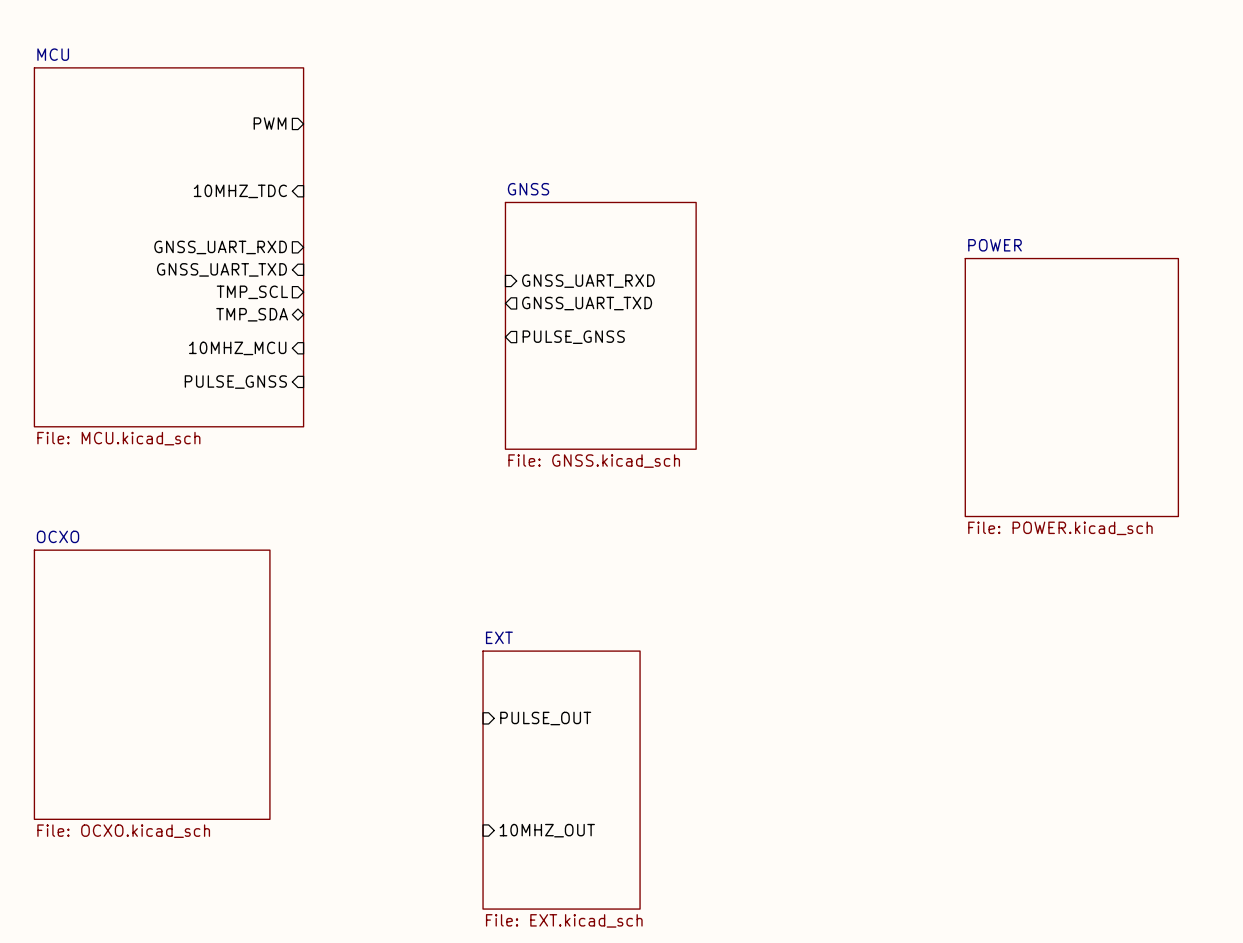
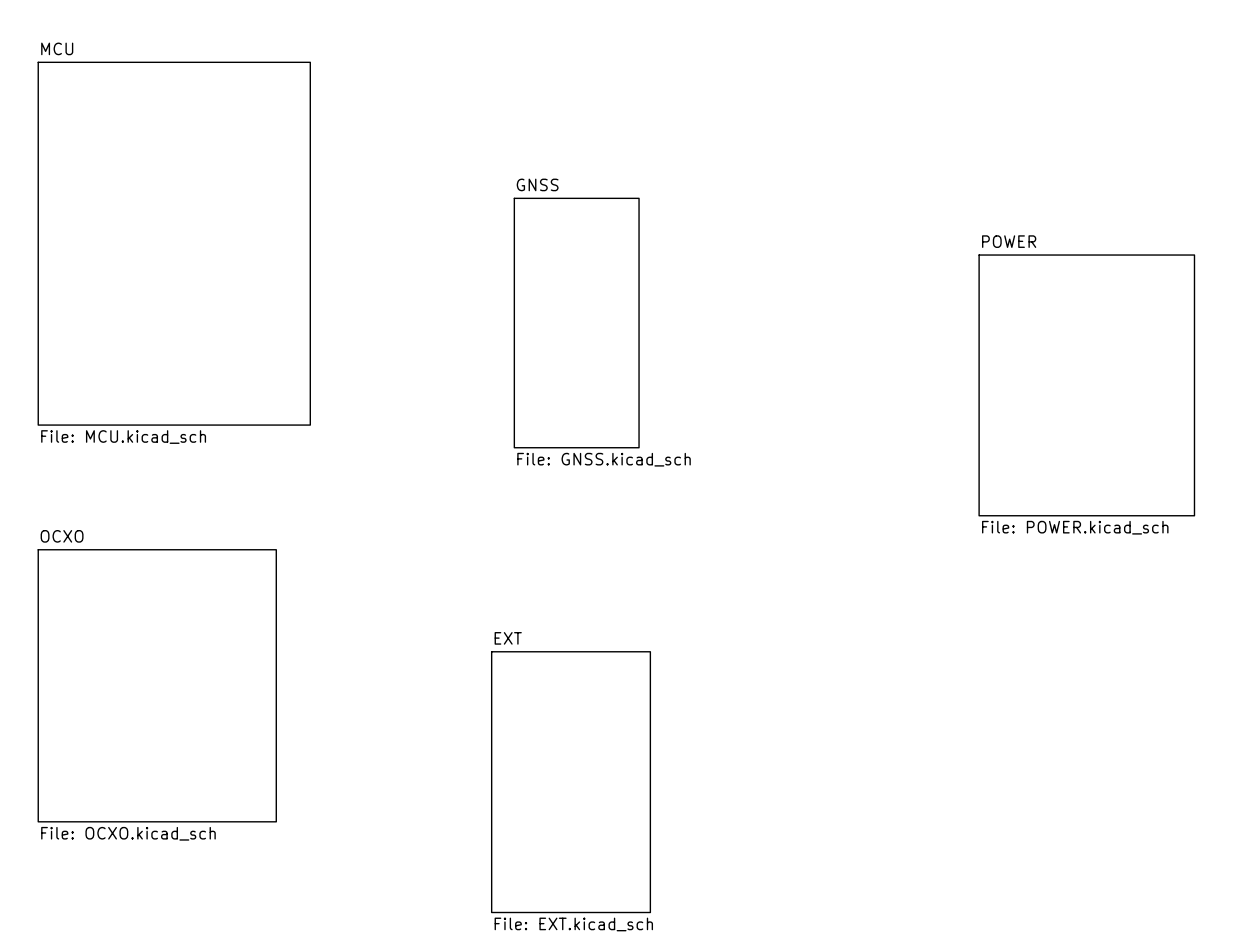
sheet pin: PWM (270, 123) -> none
sheet pin: 10MHZ_TDC (240, 191) -> none
sheet pin: GNSS_UART_RXD (220, 247) -> none
sheet pin: GNSS_UART_TXD (221, 269) -> none
sheet pin: GNSS_UART_RXD (588, 281) -> none
sheet pin: TMP_SCL (252, 292) -> none
sheet pin: GNSS_UART_TXD (587, 303) -> none
sheet pin: TMP_SDA (252, 314) -> none
sheet GNSS: none -> File: GNSS.kicad_sch (576, 323)
sheet GNSS: File: GNSS.kicad_sch (600, 325) -> none
sheet pin: PULSE_GNSS (573, 337) -> none
sheet pin: 10MHZ_MCU (237, 348) -> none
sheet pin: PULSE_GNSS (235, 382) -> none
sheet pin: PULSE_OUT (545, 718) -> none
sheet pin: 10MHZ_OUT (547, 830) -> none

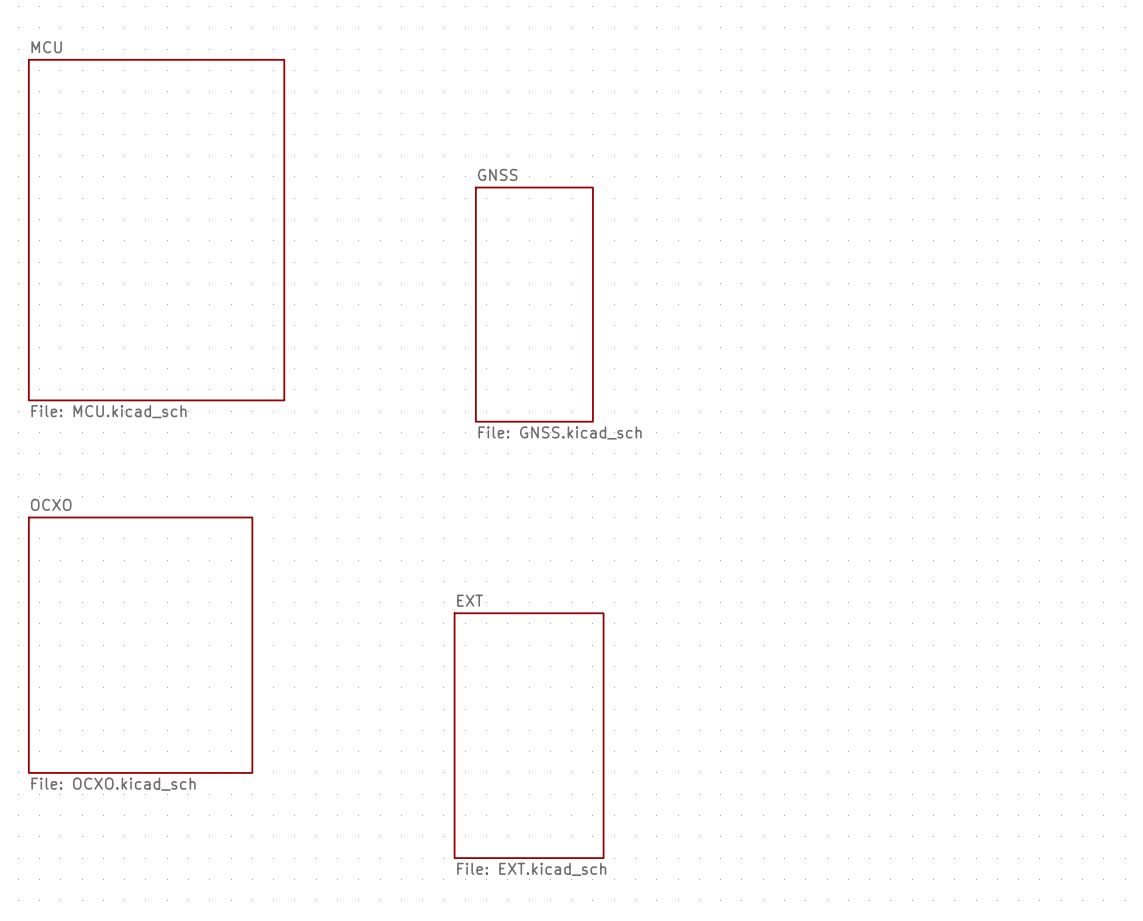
sheet POWER: File: POWER.kicad_sch (1086, 385) -> none

